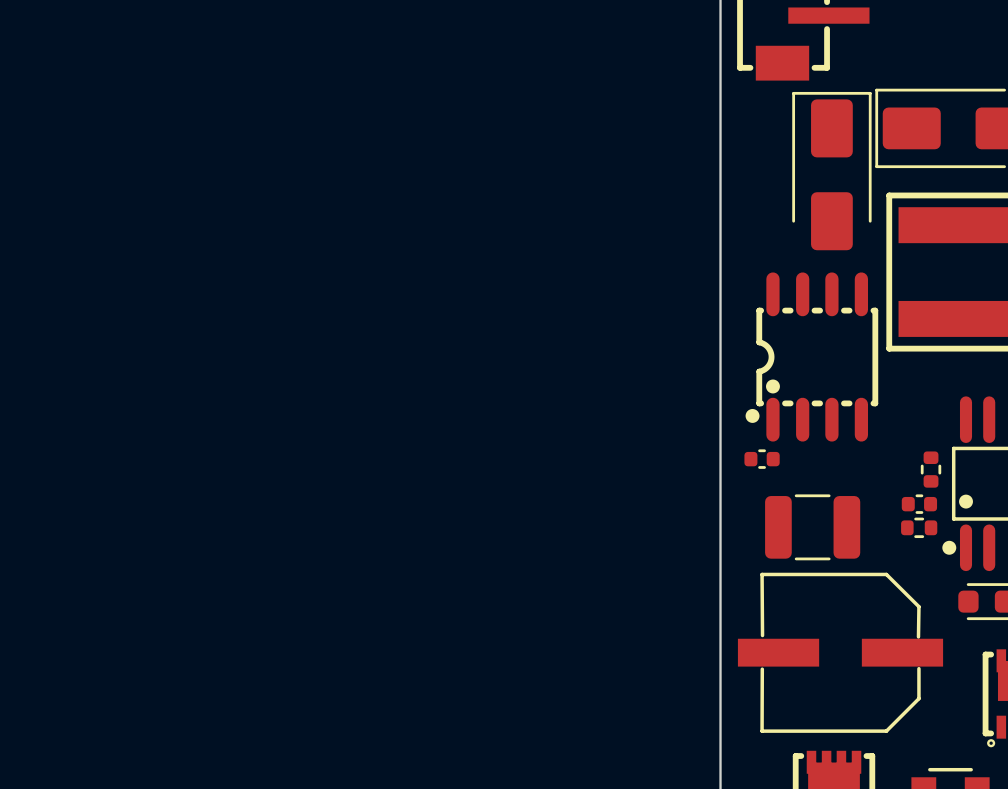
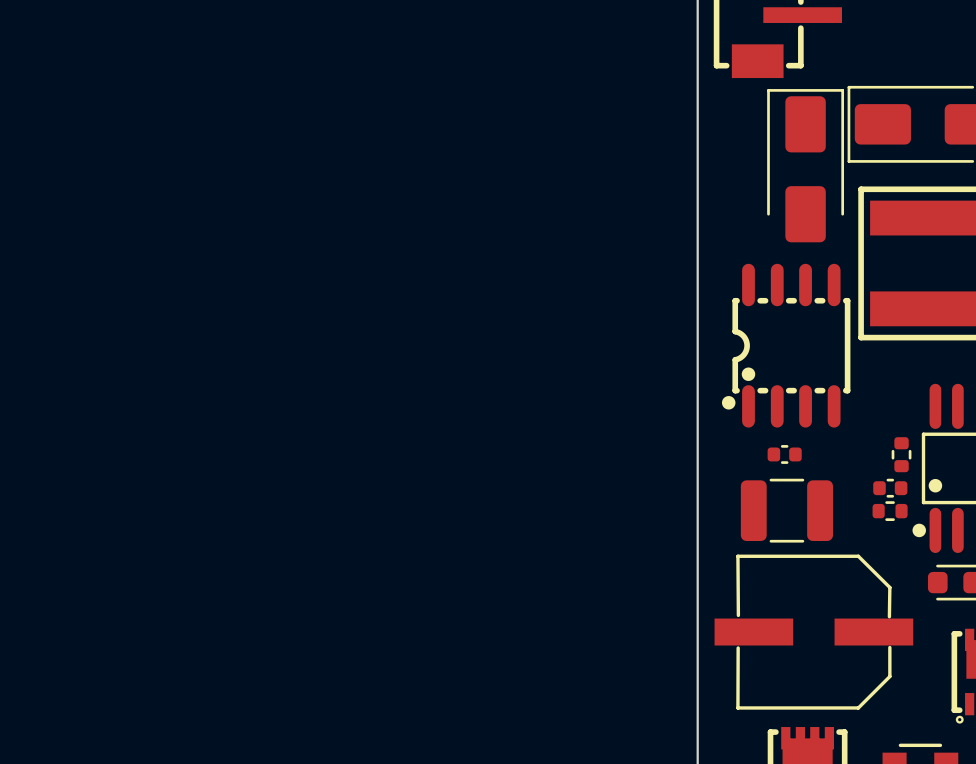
part position: (762, 459) -> (784, 454)

